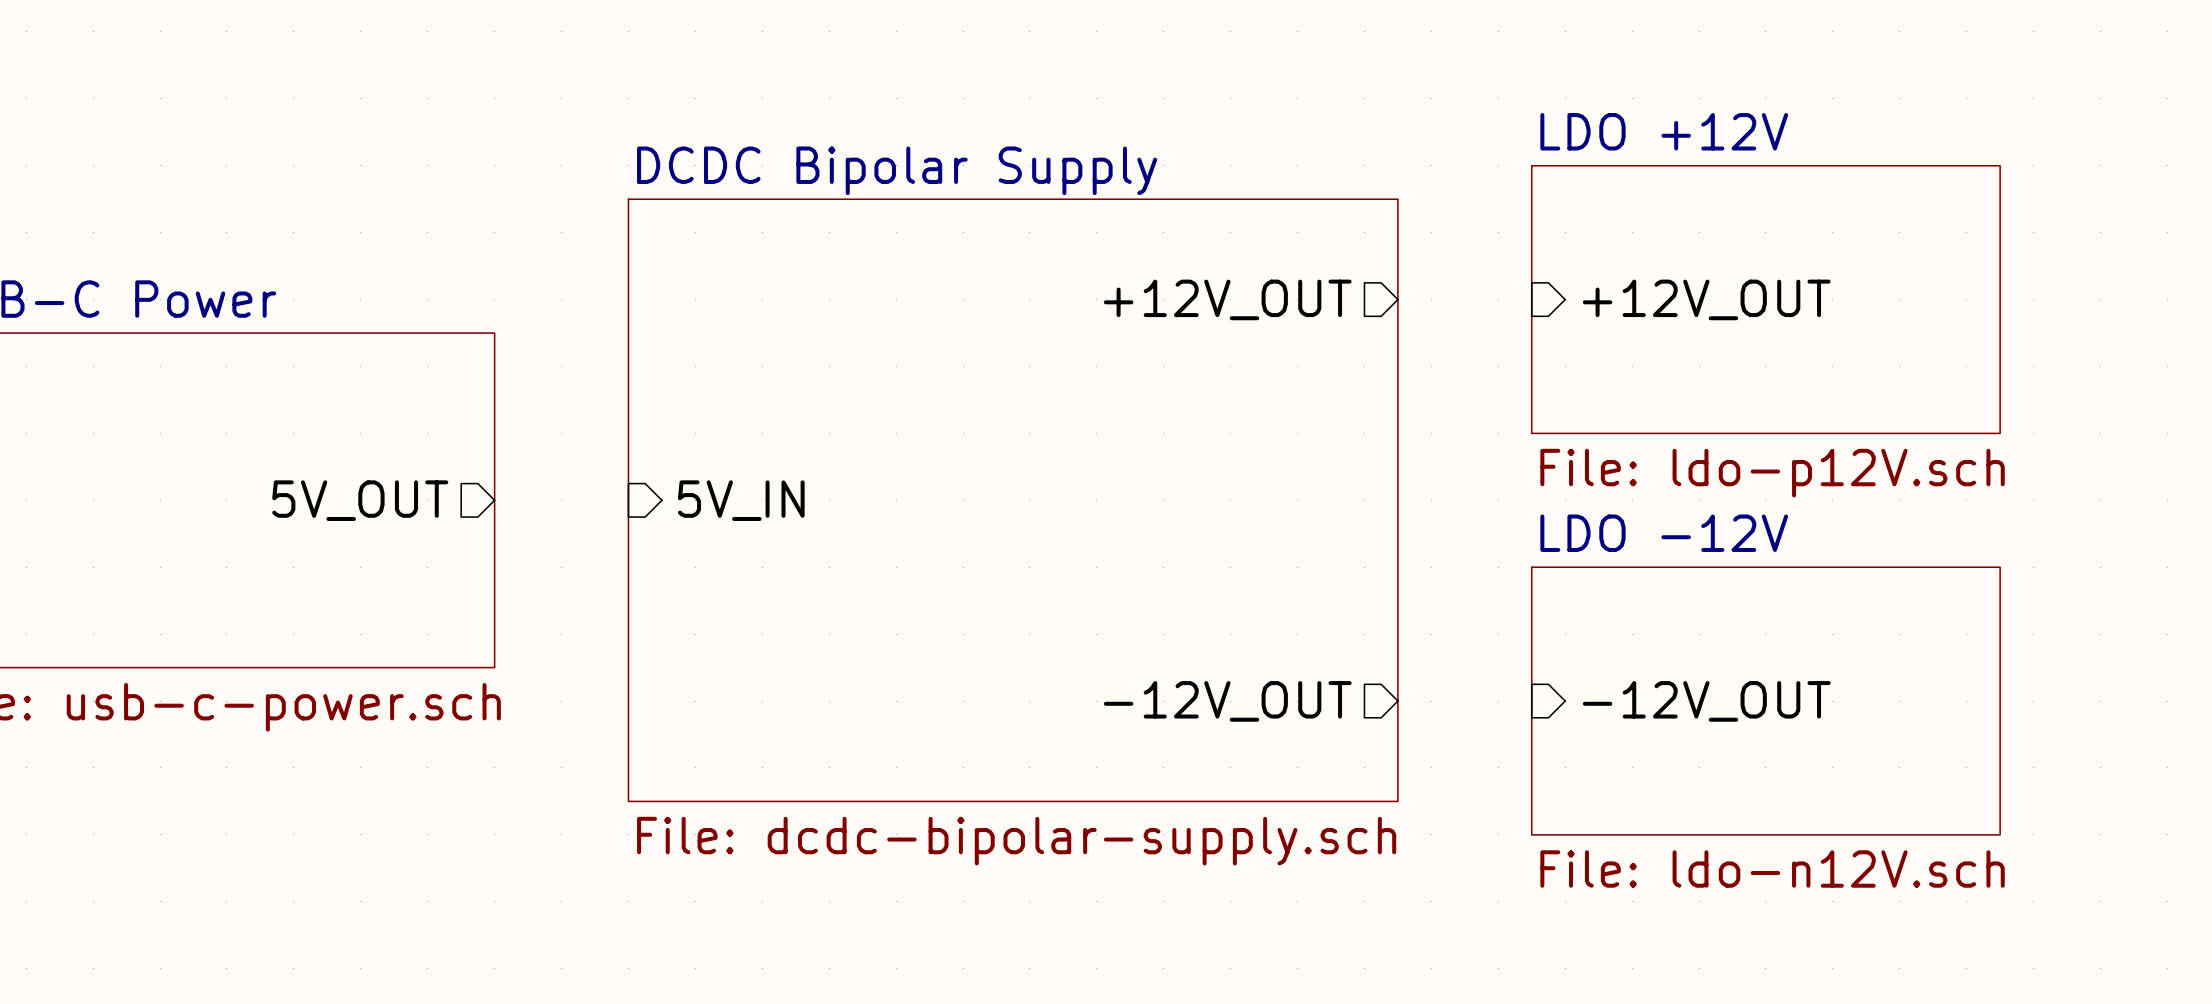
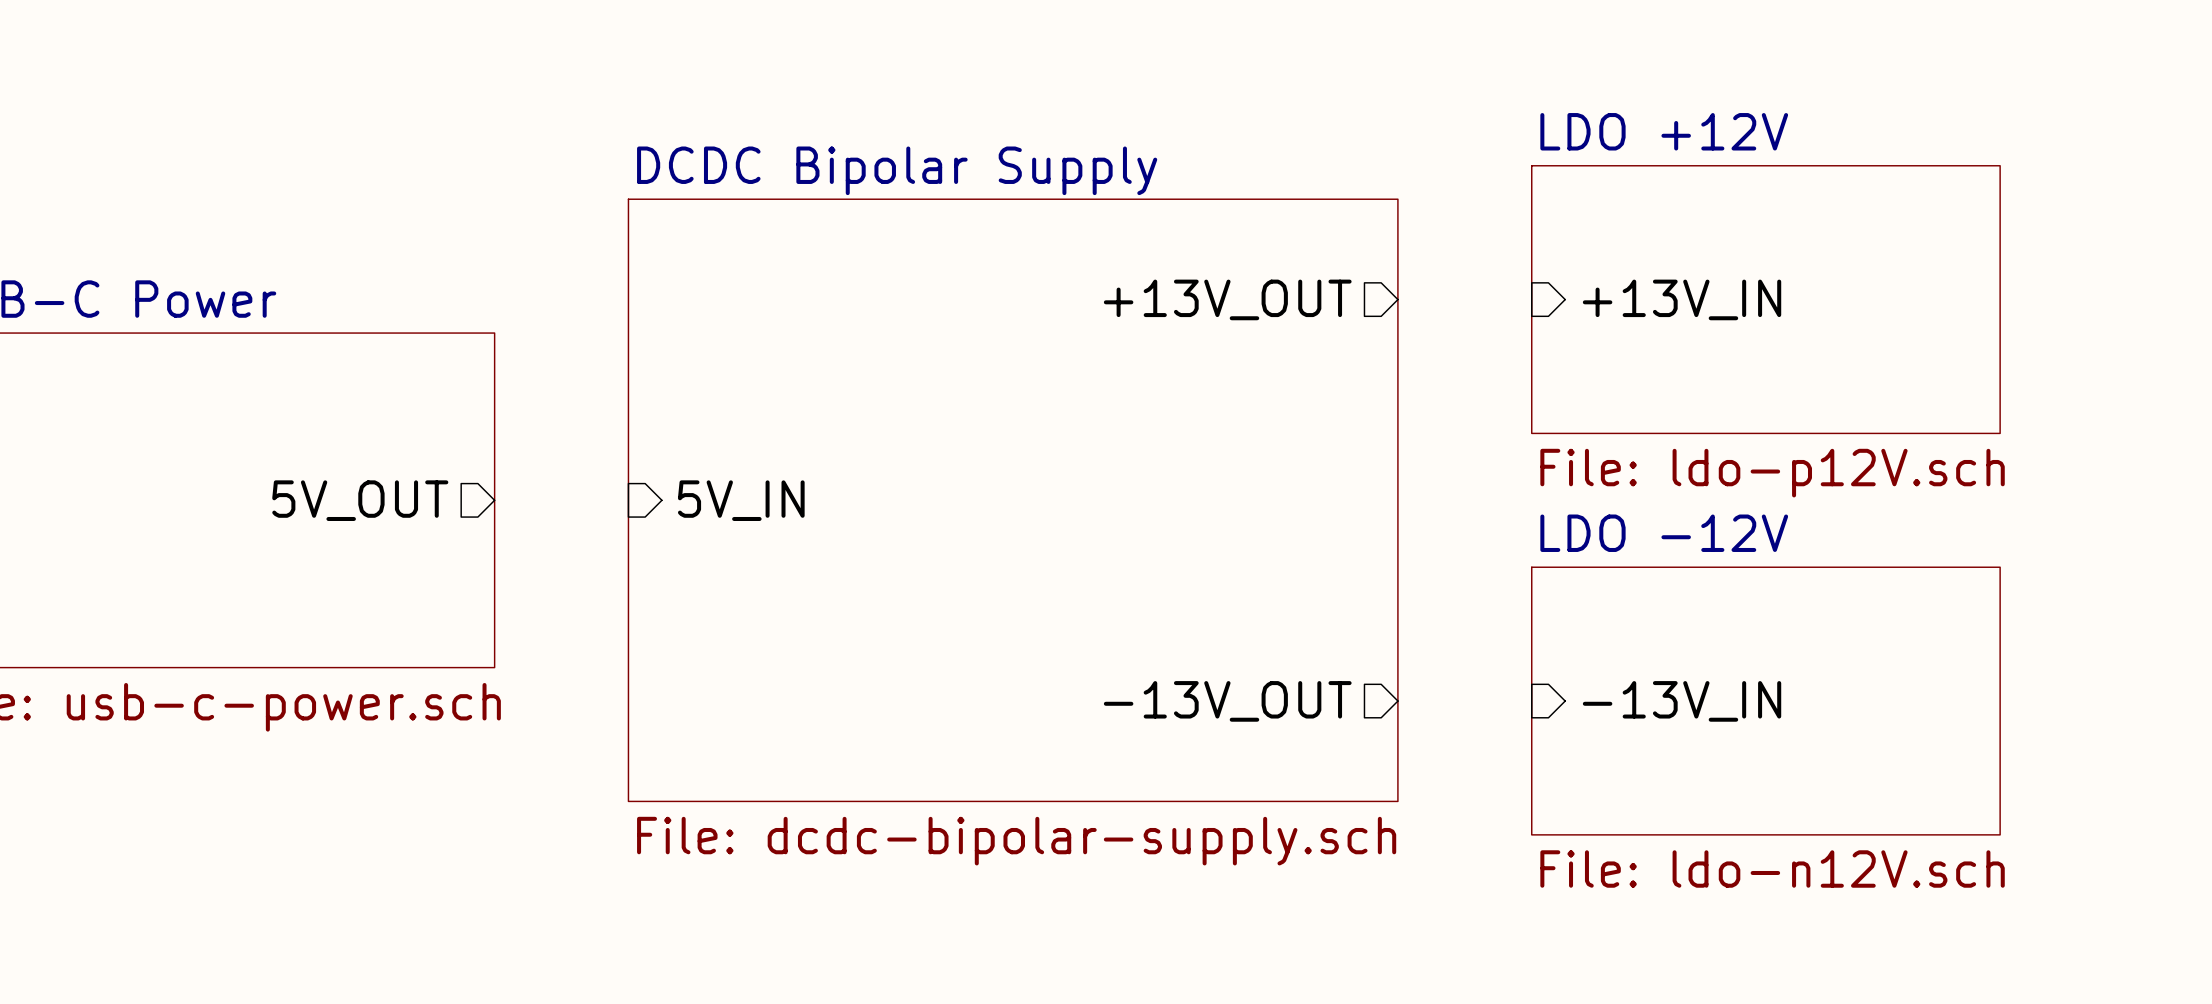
sheet pin: +12V_OUT (1227, 299) -> +13V_OUT (1227, 299)
sheet pin: +12V_OUT (1706, 299) -> +13V_IN (1682, 299)
sheet pin: -12V_OUT (1227, 701) -> -13V_OUT (1227, 701)
sheet pin: -12V_OUT (1706, 701) -> -13V_IN (1682, 701)

